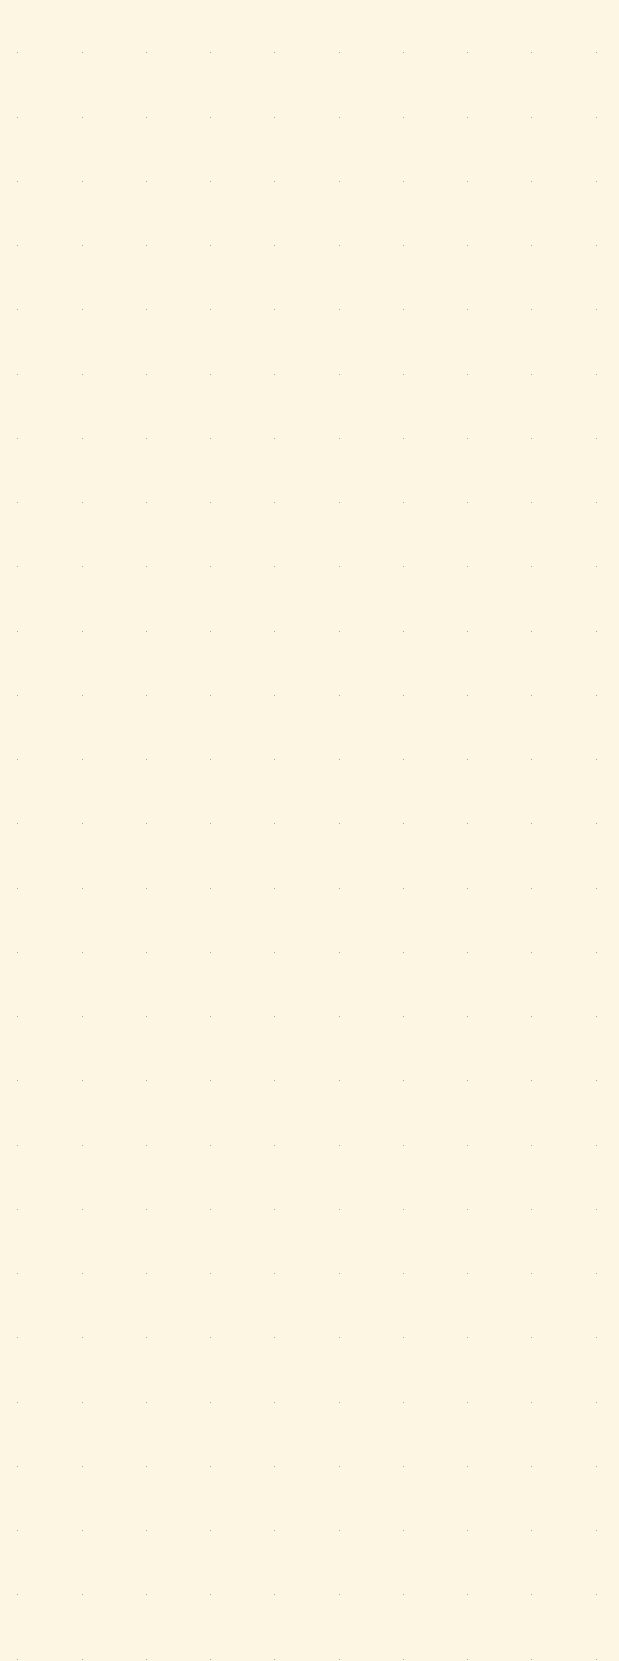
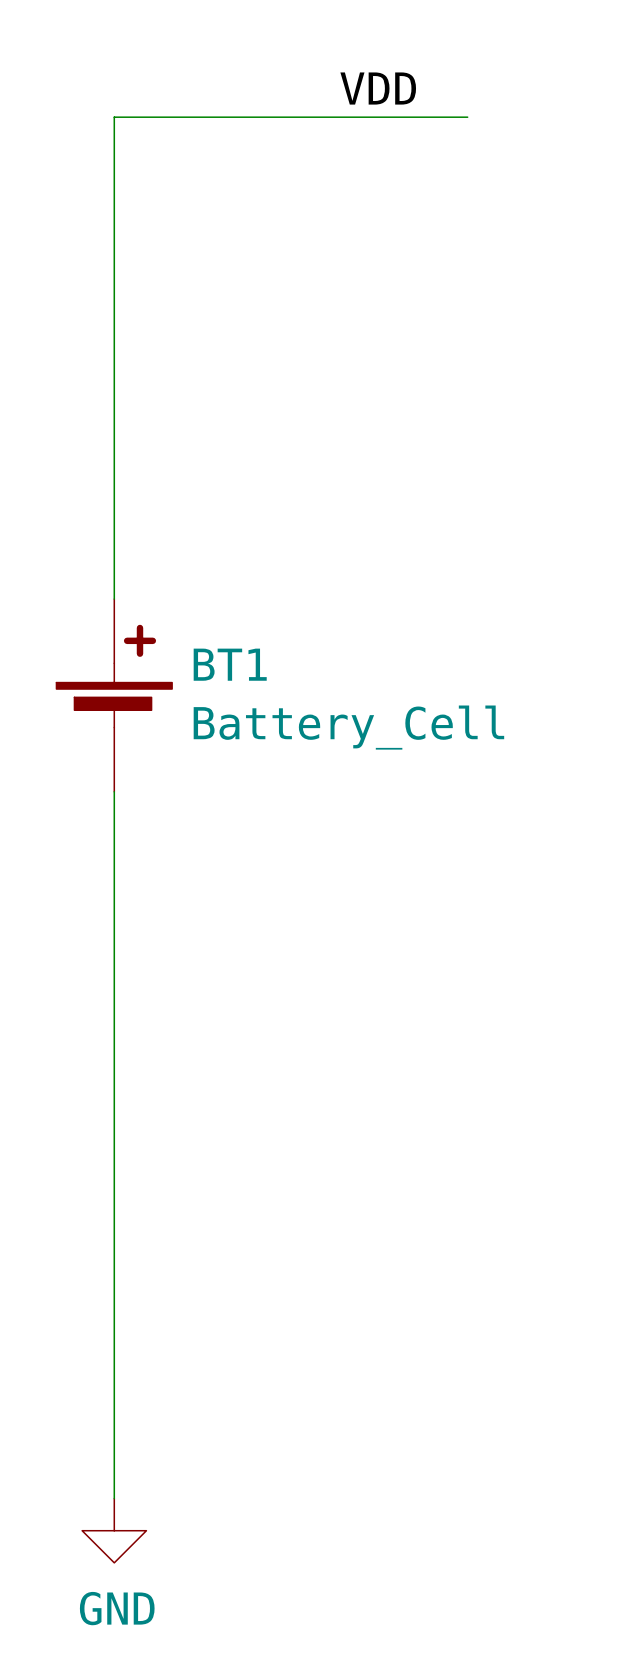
label: none -> VDD (378, 88)
wire: none -> (467, 117) (114, 117) (114, 599)
BT1: none -> Battery_Cell (114, 695)
wire: none -> (114, 791) (114, 1498)
power symbol: none -> GND (114, 1530)

